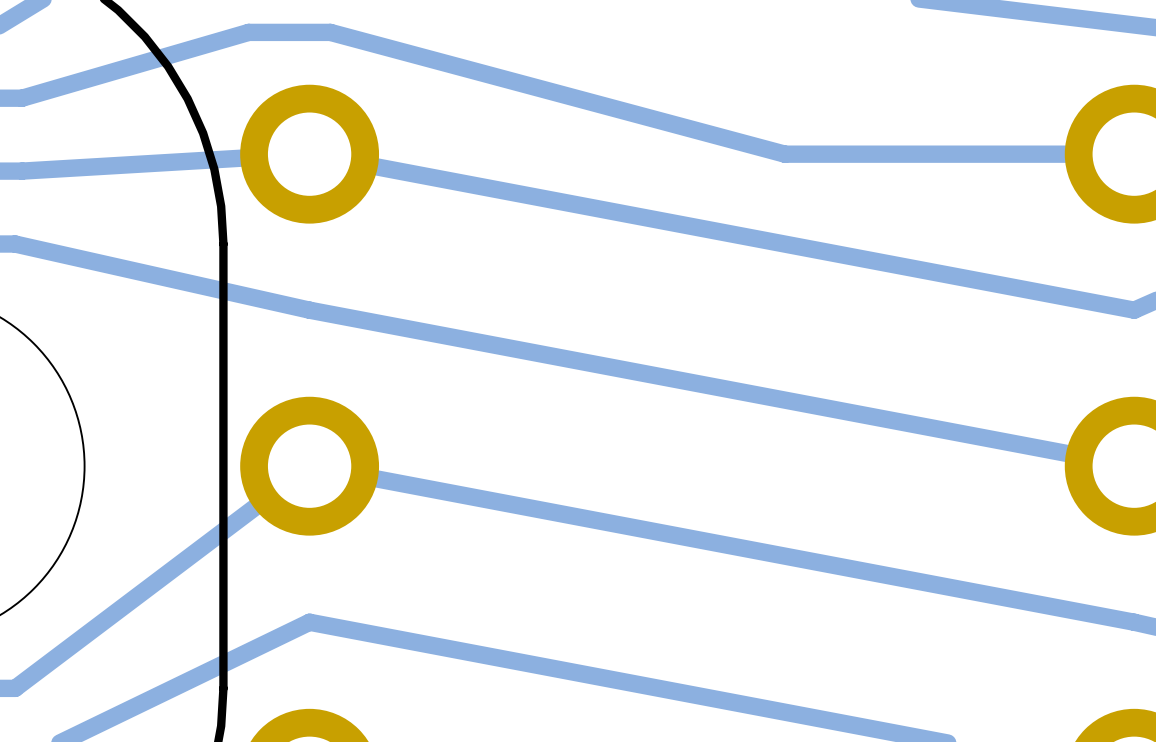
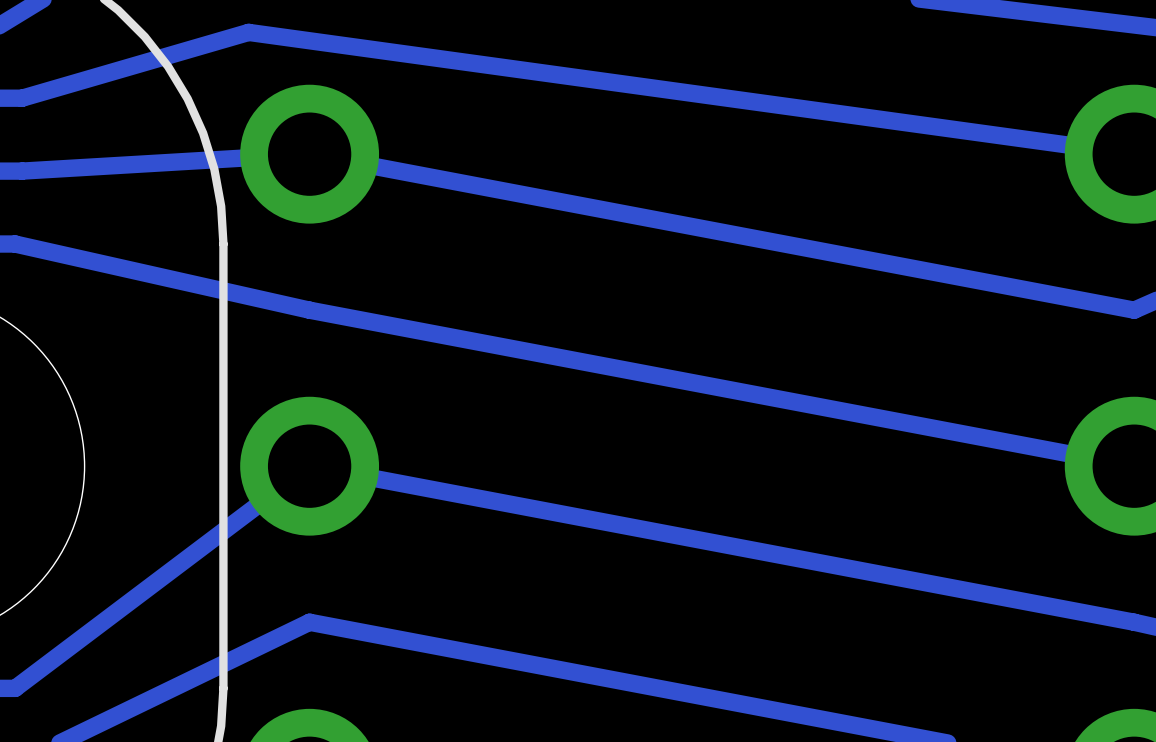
bottom track: (248, 32) (330, 32) (784, 154) (1134, 154) -> (248, 32) (1134, 154)

